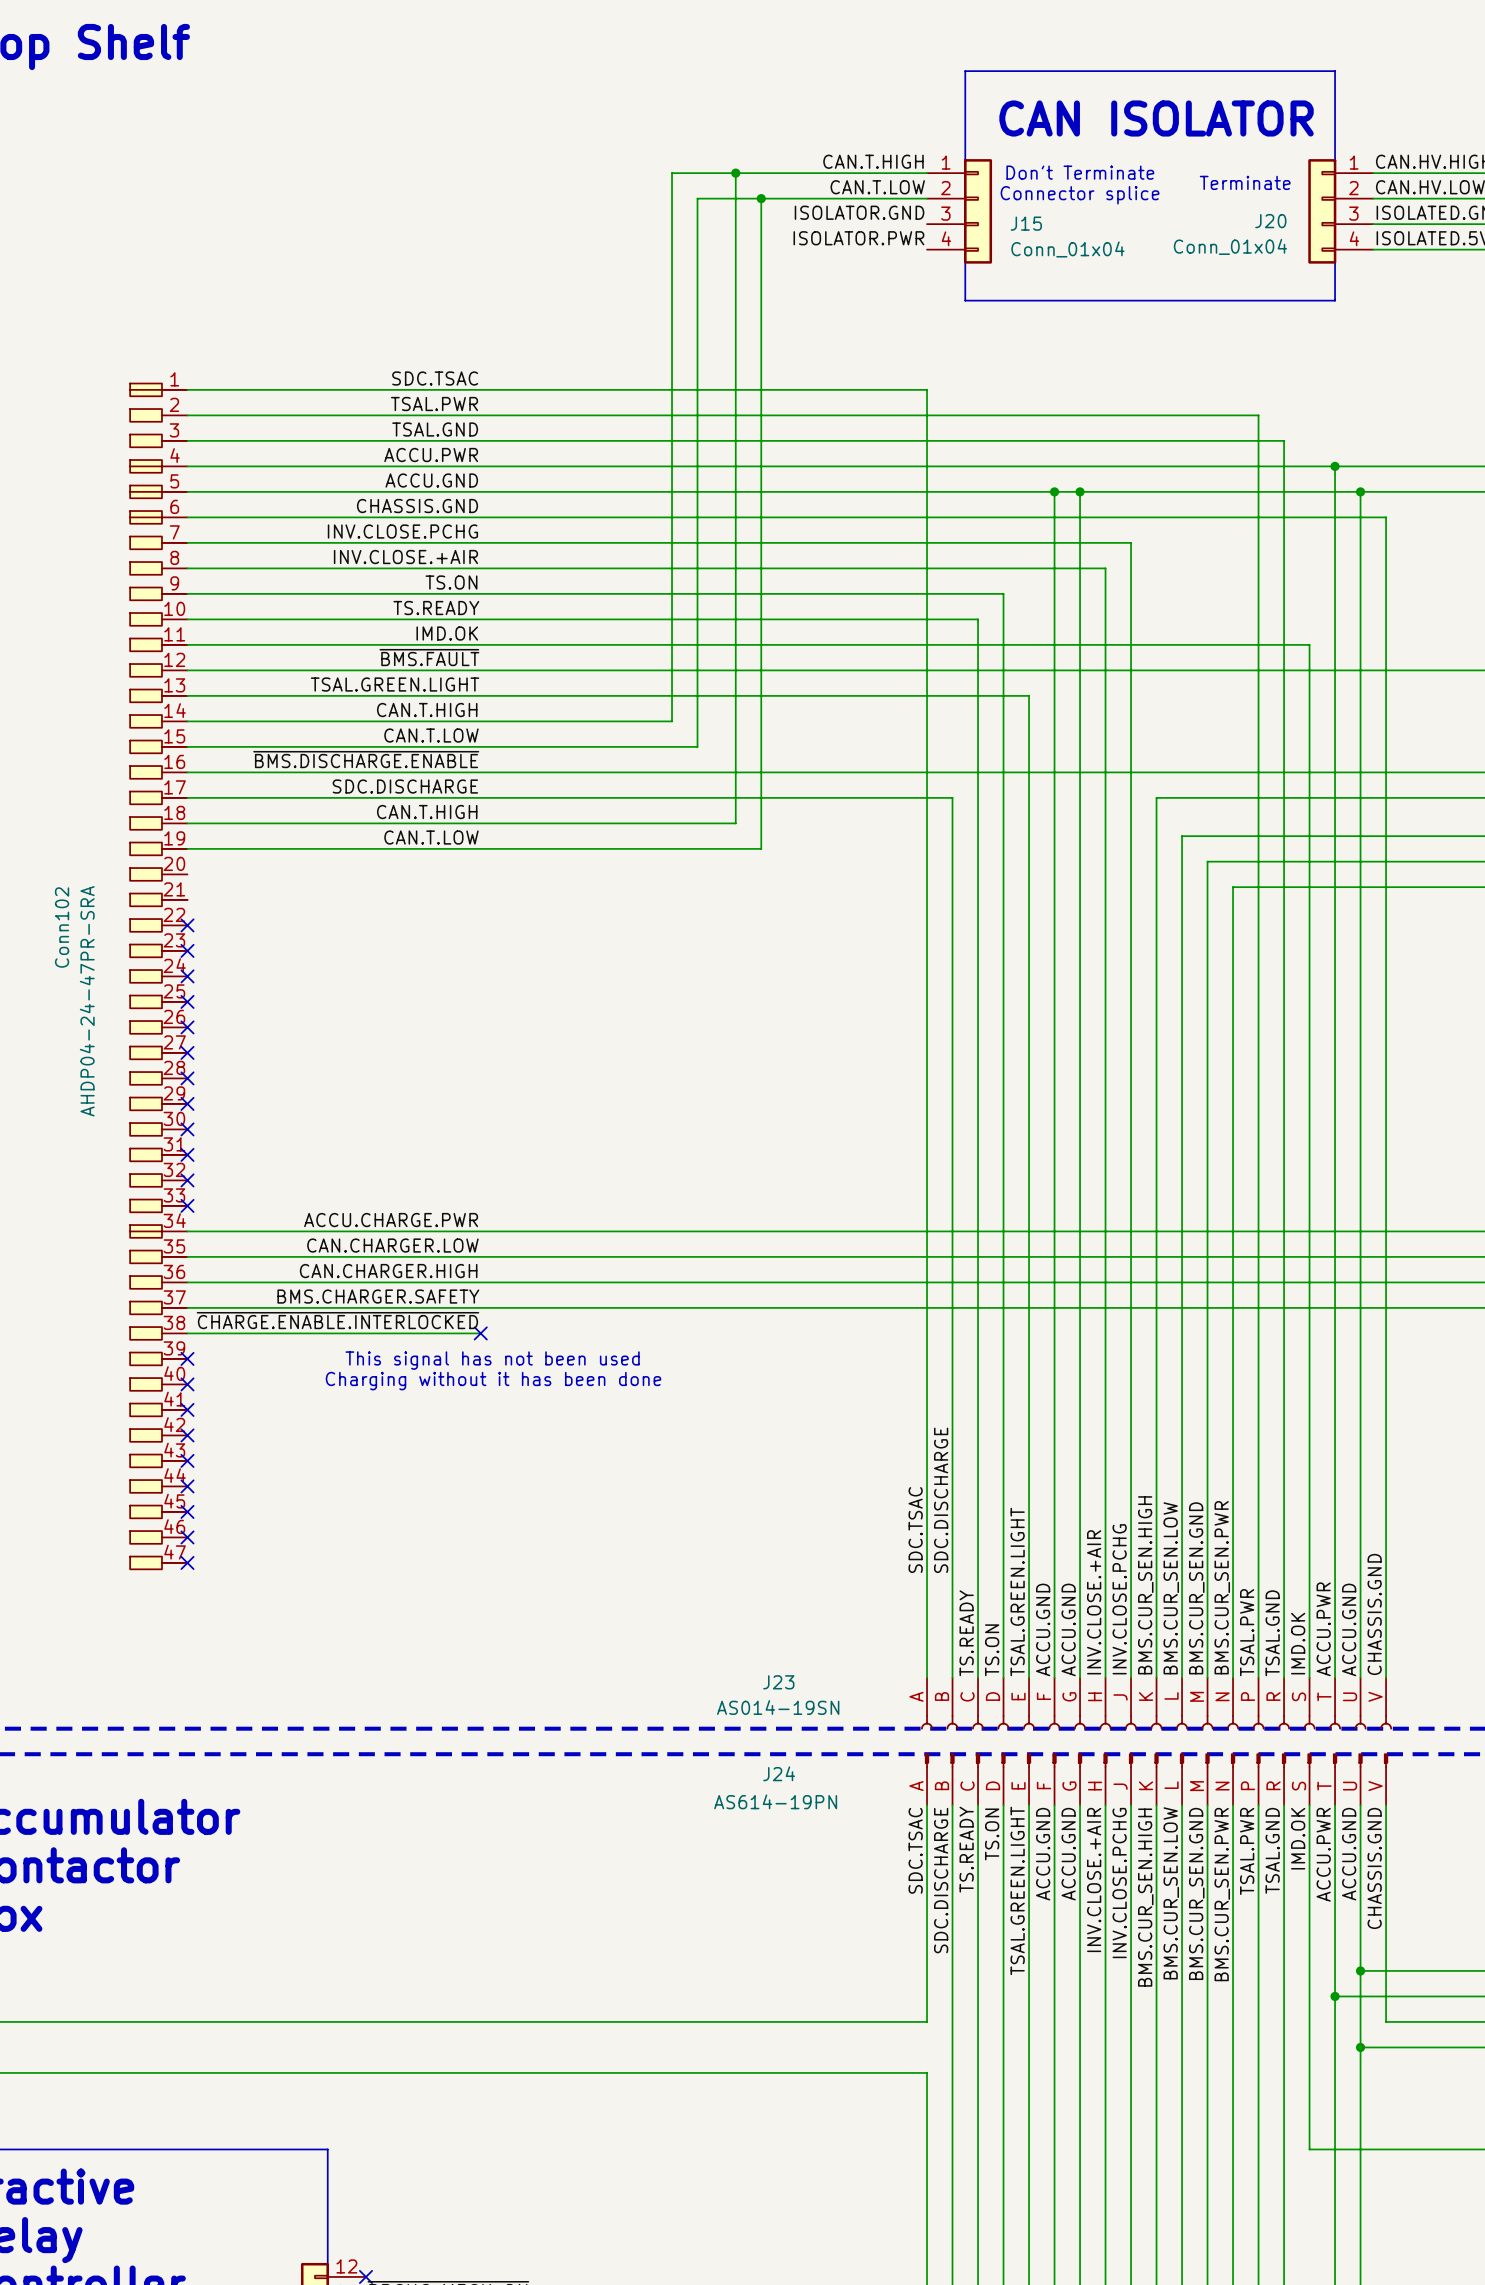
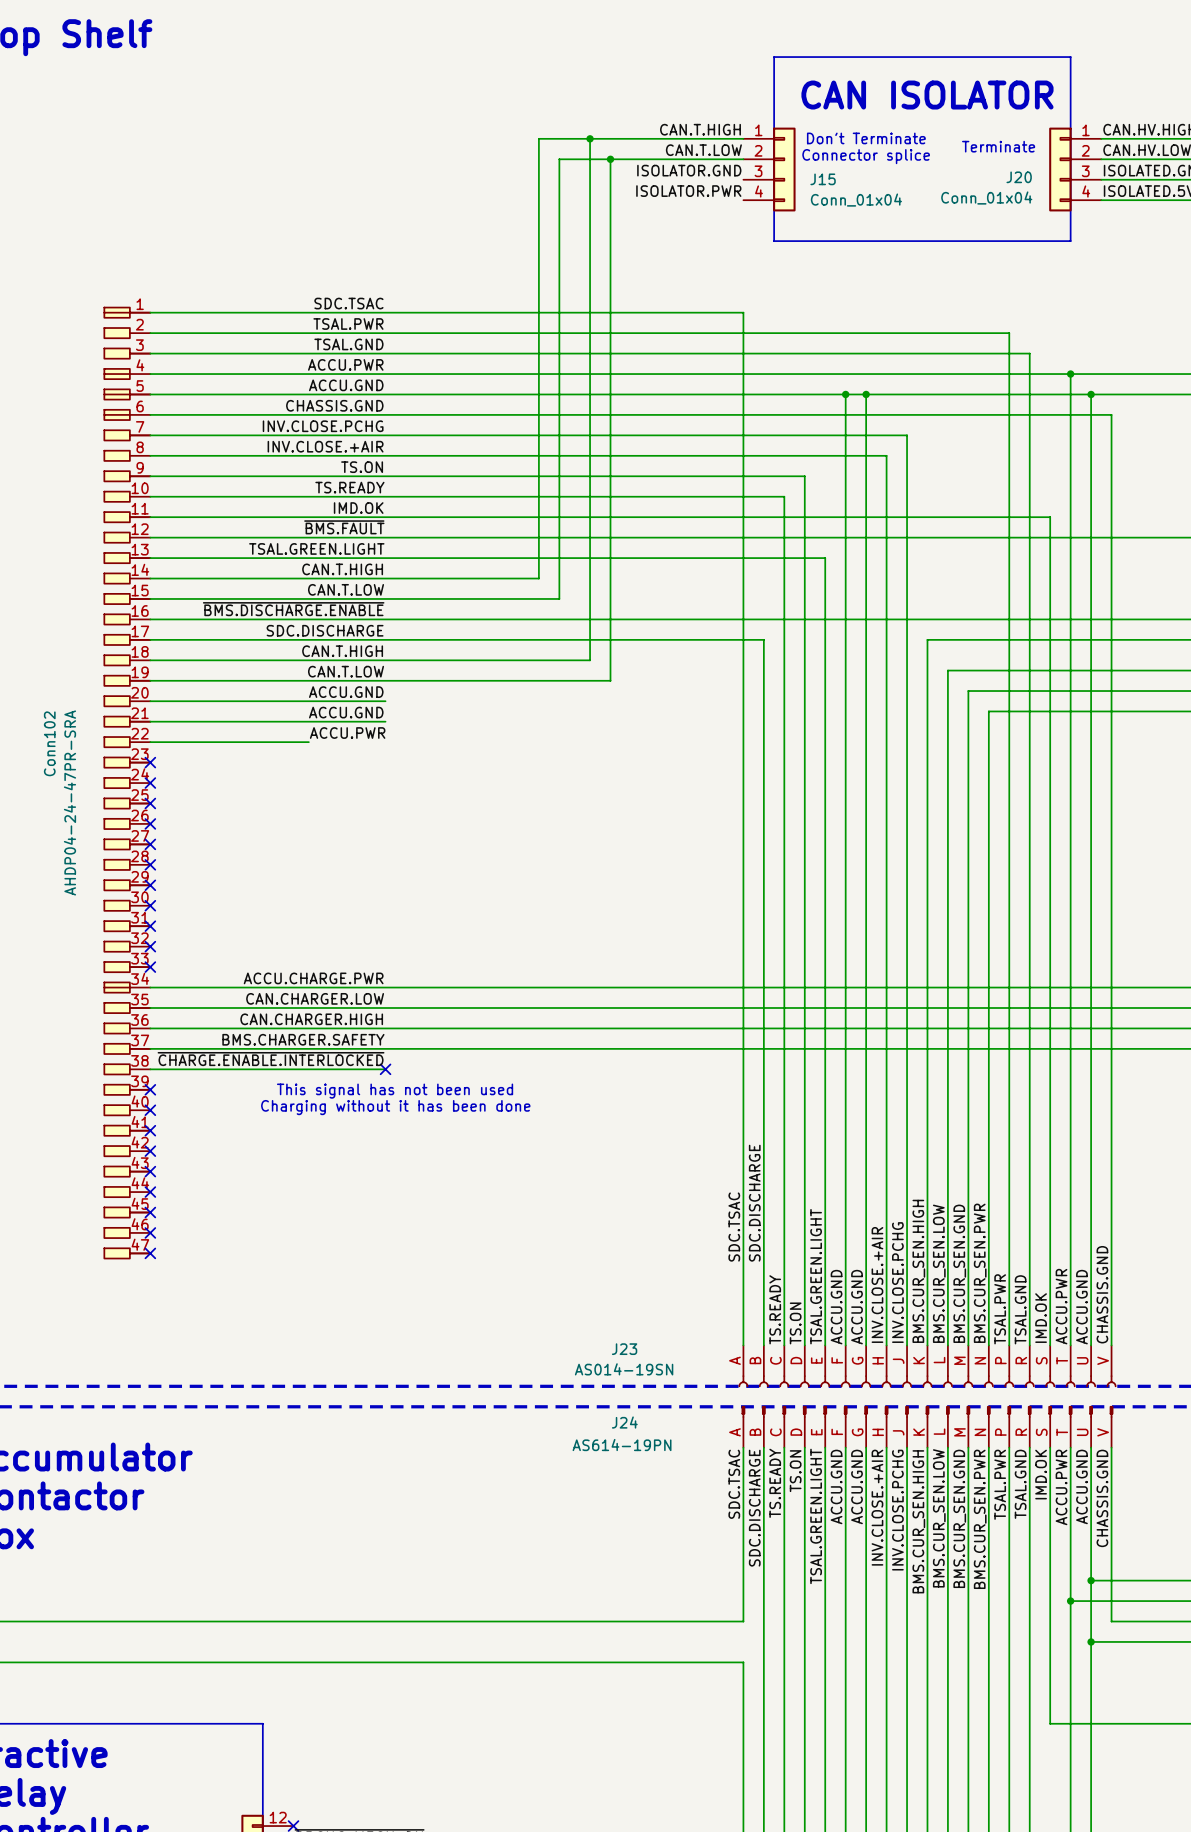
label: none -> ACCU.GND (346, 692)
wire: none -> (150, 701) (385, 701)
label: none -> ACCU.GND (346, 712)
wire: none -> (150, 721) (385, 721)
label: none -> ACCU.PWR (347, 733)
wire: none -> (150, 742) (308, 742)
no-connect mark: (187, 925) -> none

